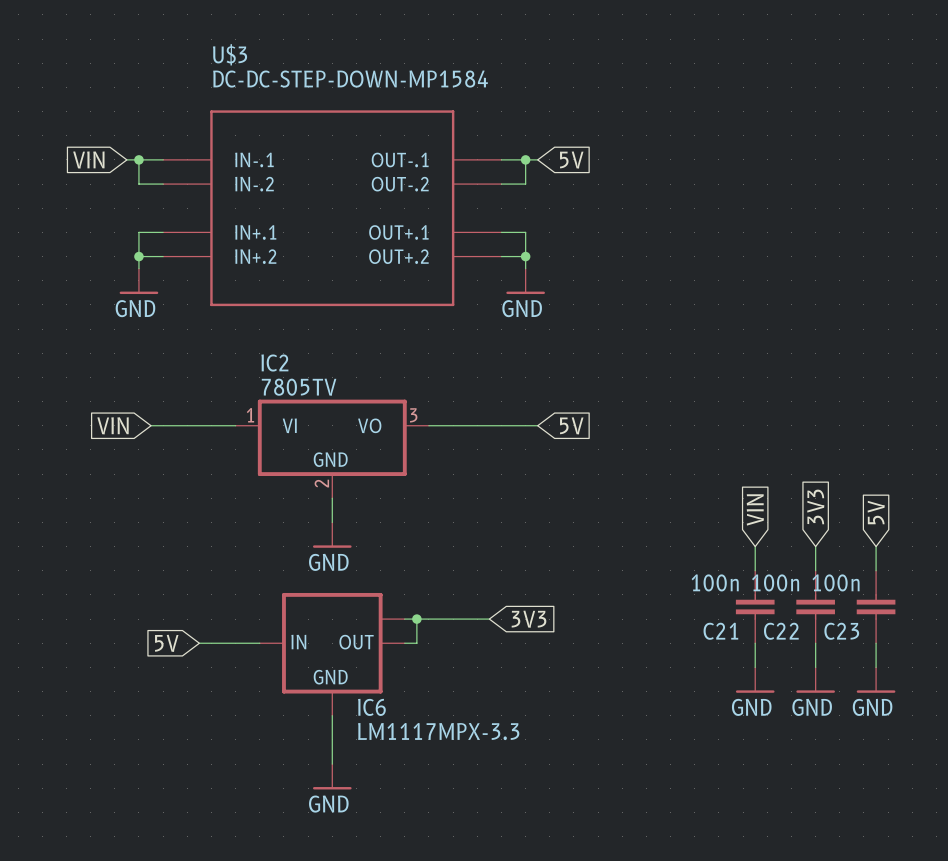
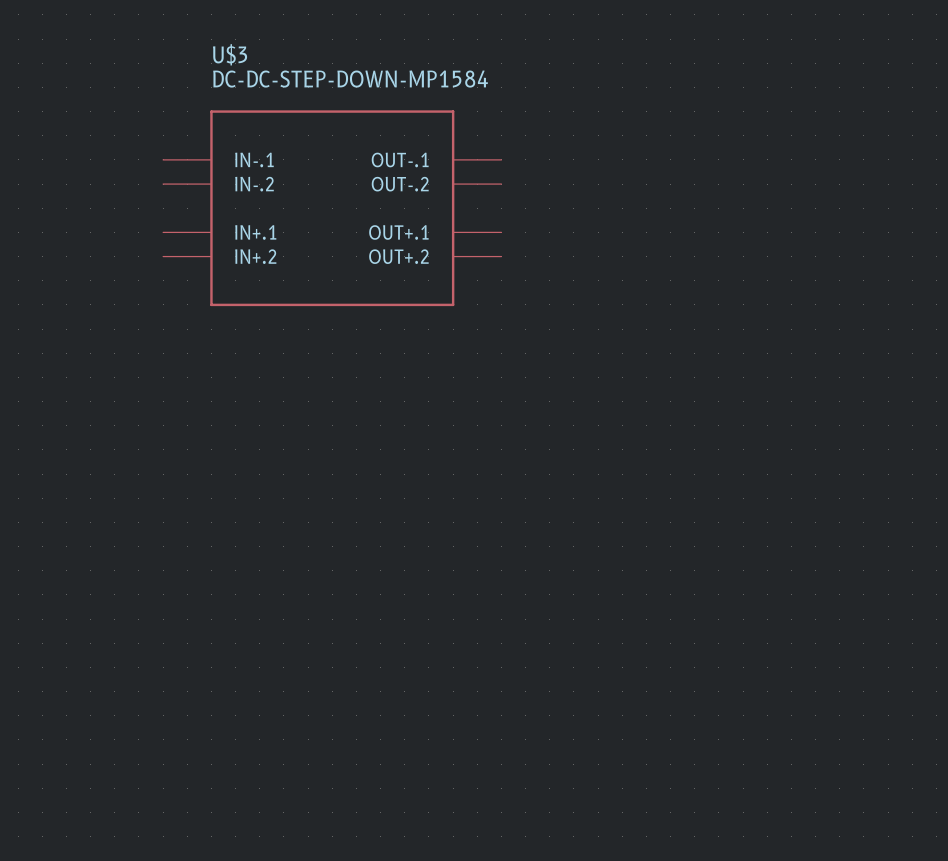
wire: (126, 159) (163, 159) -> none
wire: (138, 159) (138, 184) (163, 184) -> none
junction: (138, 159) -> none
wire: (501, 159) (537, 159) -> none
wire: (525, 159) (525, 184) (501, 184) -> none
junction: (525, 159) -> none
global label: VIN (88, 160) -> none
global label: 5V (571, 160) -> none
wire: (163, 232) (138, 232) (138, 268) -> none
wire: (501, 232) (525, 232) (525, 268) -> none
wire: (138, 256) (163, 256) -> none
junction: (138, 256) -> none
wire: (501, 256) (525, 256) -> none
junction: (525, 256) -> none
power symbol: GND (138, 281) -> none
power symbol: GND (525, 281) -> none
global label: VIN (113, 425) -> none
wire: (151, 425) (235, 425) -> none
wire: (428, 425) (537, 425) -> none
global label: 5V (571, 425) -> none
IC2: 7805TV (332, 448) -> none
wire: (332, 498) (332, 522) -> none
global label: 3V3 (815, 506) -> none
global label: VIN (755, 509) -> none
global label: 5V (876, 512) -> none
power symbol: GND (332, 535) -> none
wire: (755, 546) (755, 570) -> none
wire: (815, 546) (815, 570) -> none
wire: (876, 546) (876, 570) -> none
C21: 100n (755, 606) -> none
C22: 100n (815, 606) -> none
C23: 100n (876, 606) -> none
wire: (404, 619) (489, 619) -> none
wire: (416, 619) (416, 643) (404, 643) -> none
junction: (416, 619) -> none
global label: 3V3 (529, 619) -> none
global label: 5V (166, 643) -> none
wire: (199, 643) (259, 643) -> none
wire: (755, 643) (755, 667) -> none
wire: (815, 643) (815, 667) -> none
wire: (876, 643) (876, 667) -> none
IC6: LM1117MPX-3.3 (332, 654) -> none
power symbol: GND (755, 680) -> none
power symbol: GND (815, 680) -> none
power symbol: GND (876, 680) -> none
wire: (332, 715) (332, 764) -> none
power symbol: GND (332, 776) -> none

